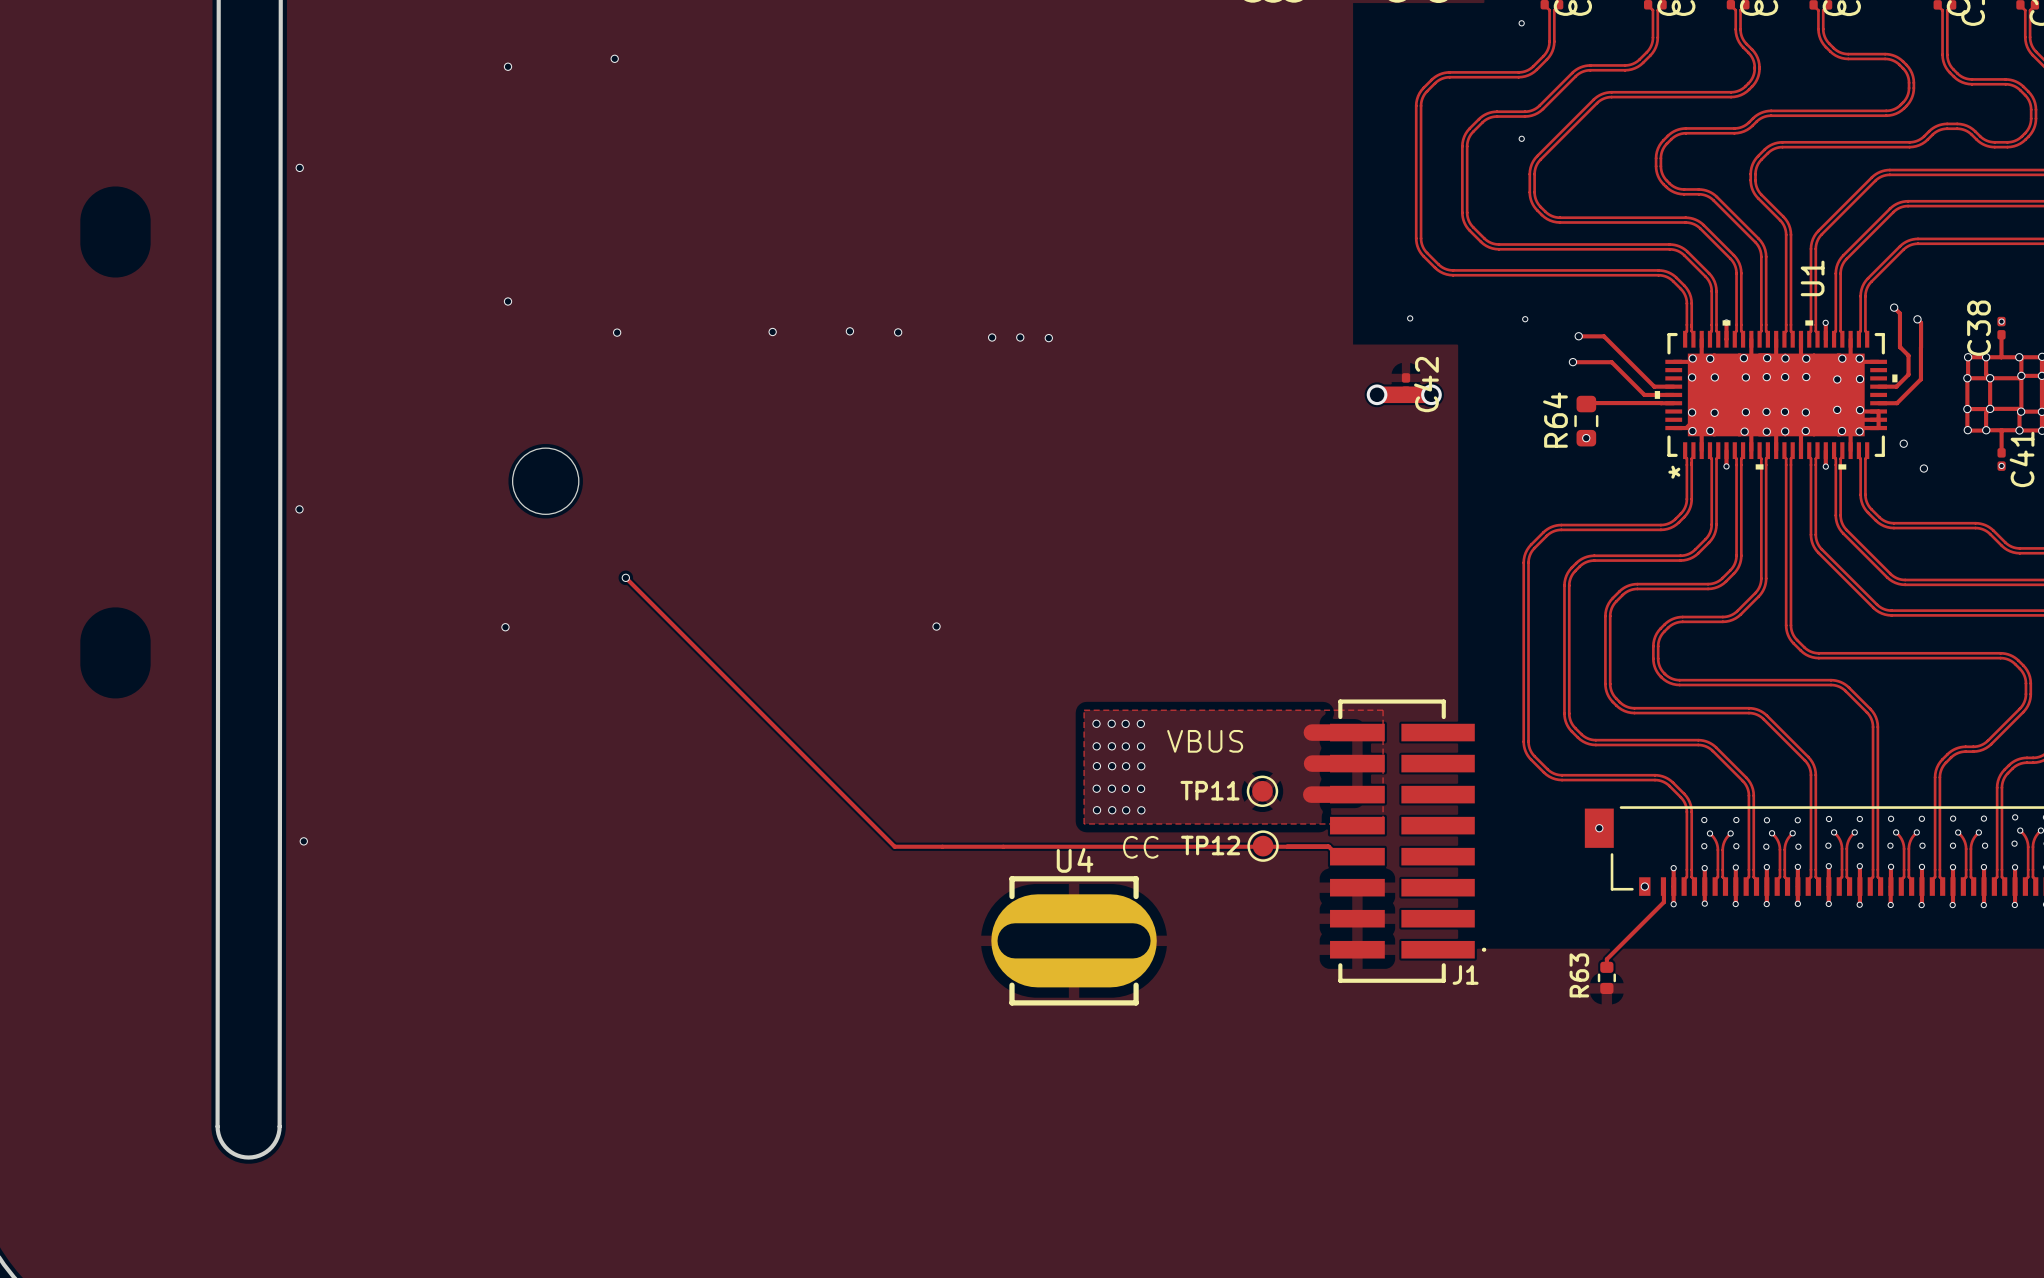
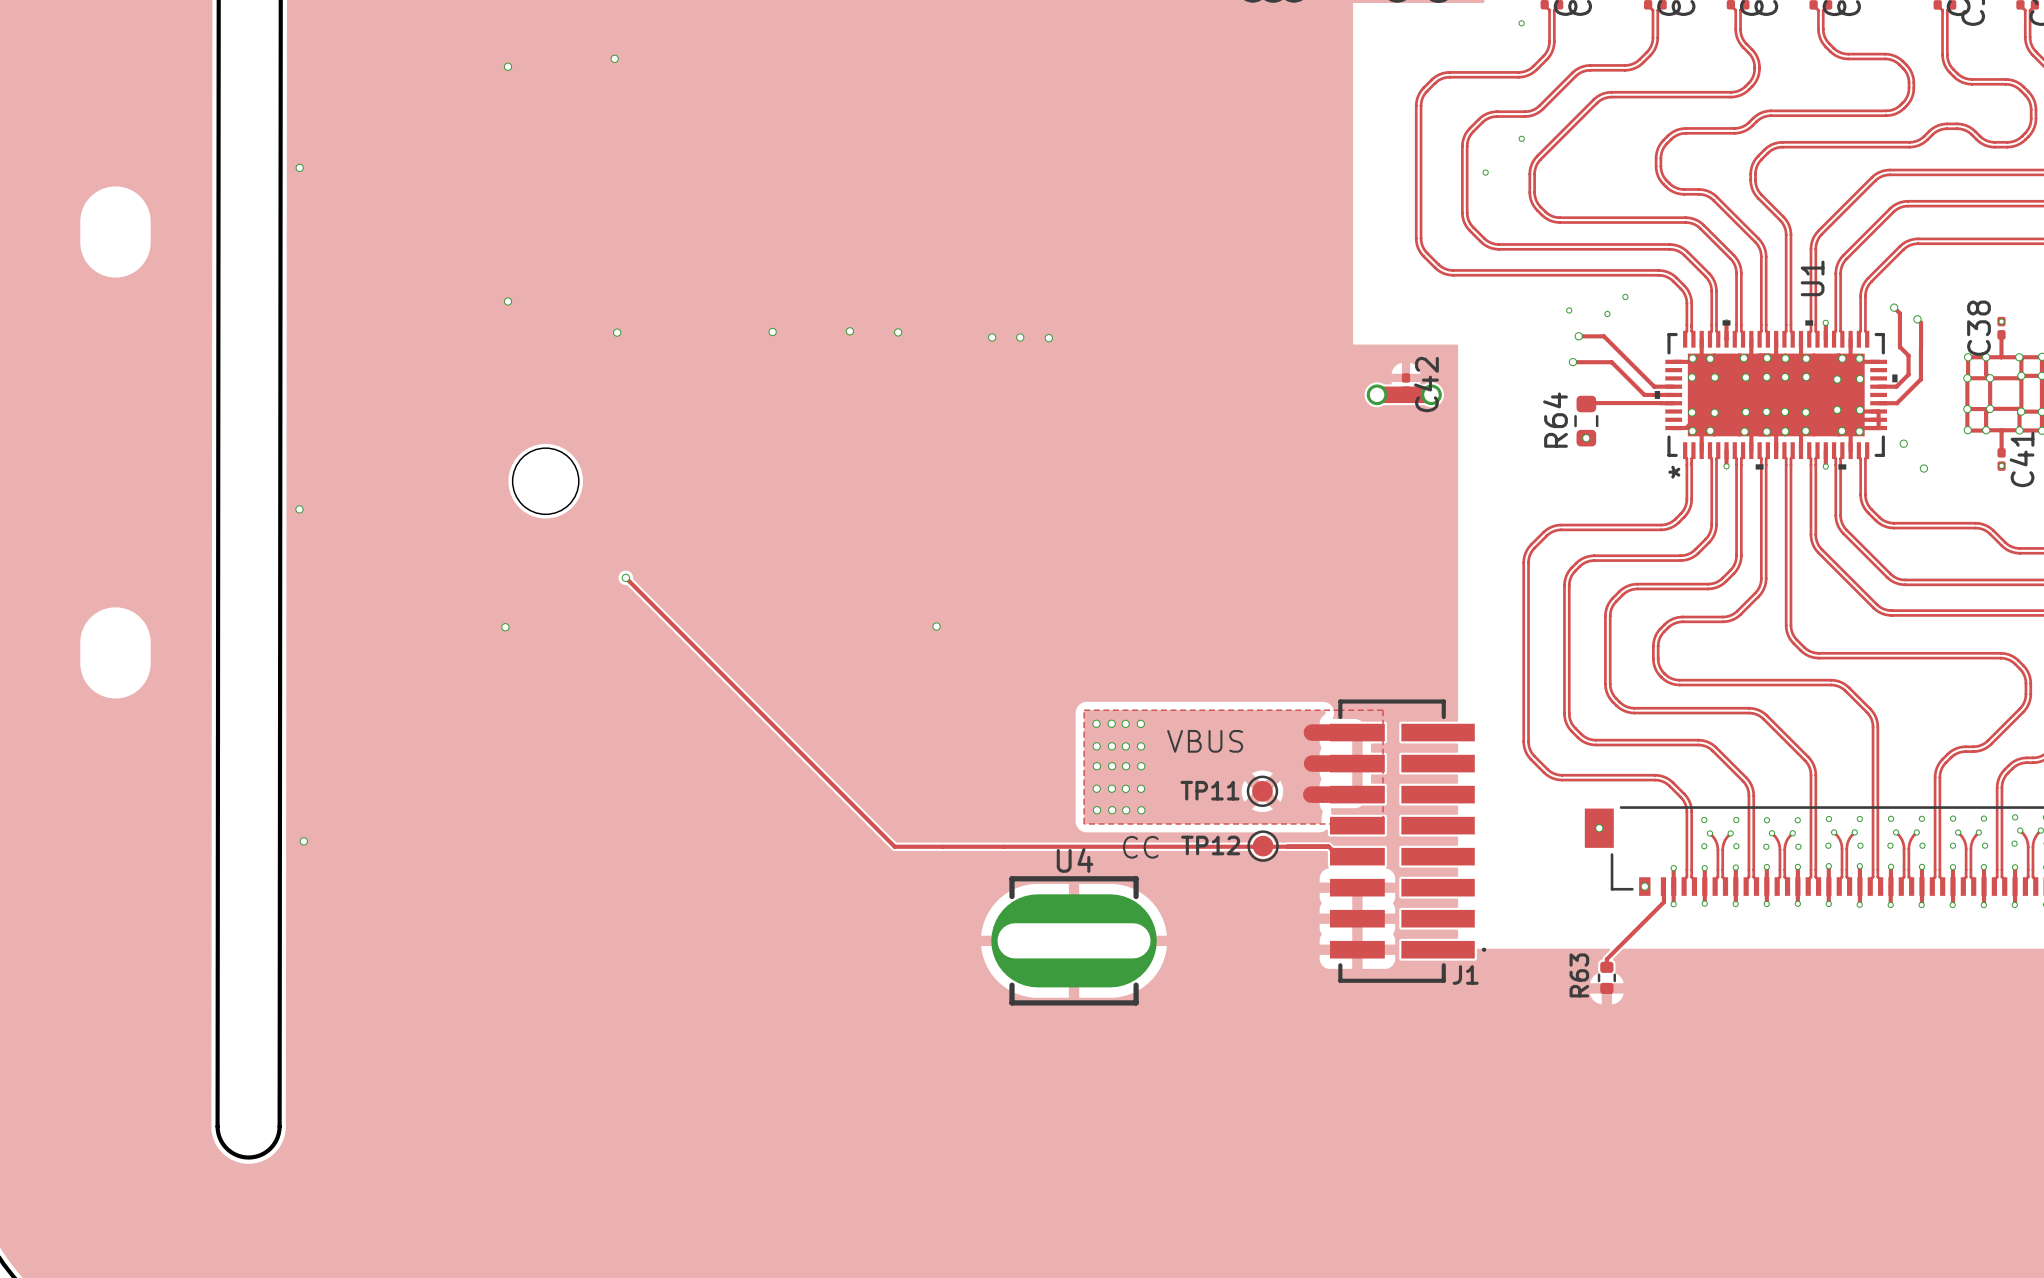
via: none -> (1485, 172)
via: none -> (1625, 296)
via: none -> (1569, 310)
via: none -> (1607, 314)
via: (1410, 318) -> none
via: (1525, 319) -> none

